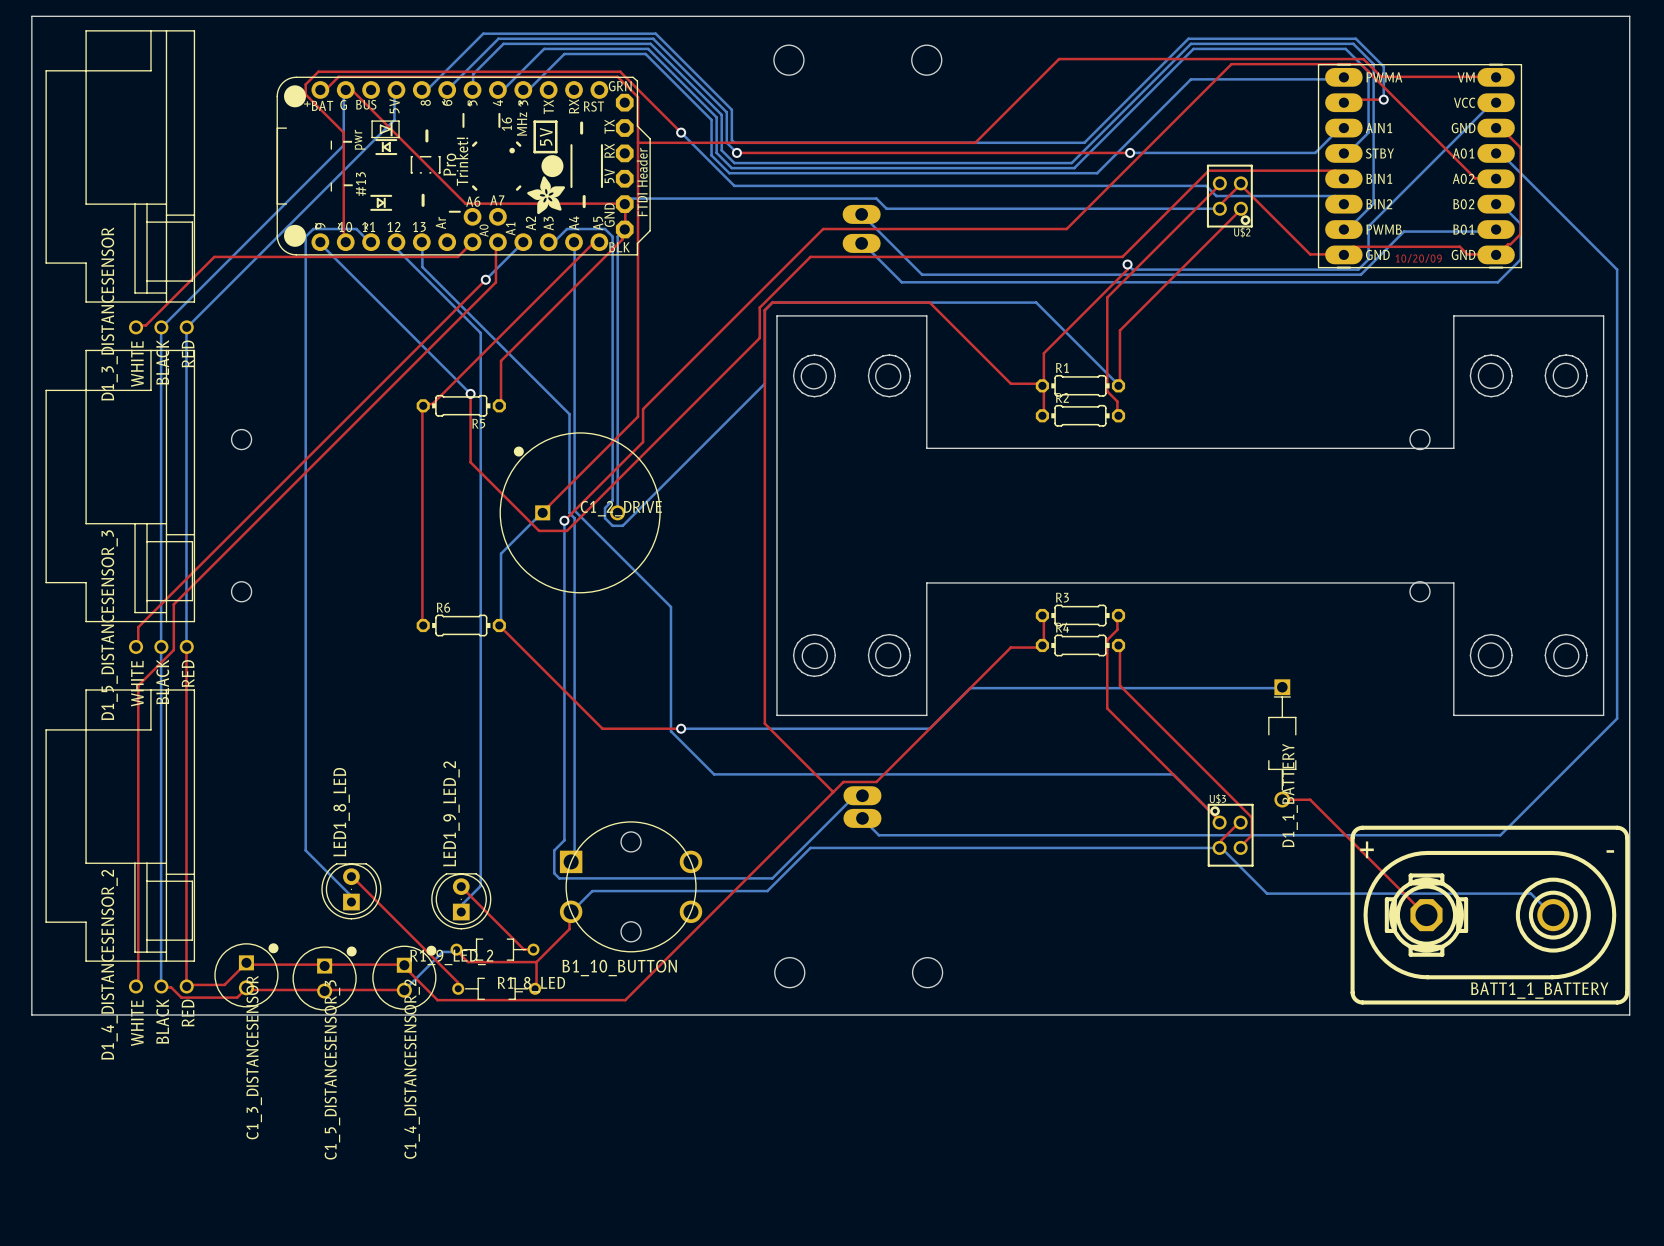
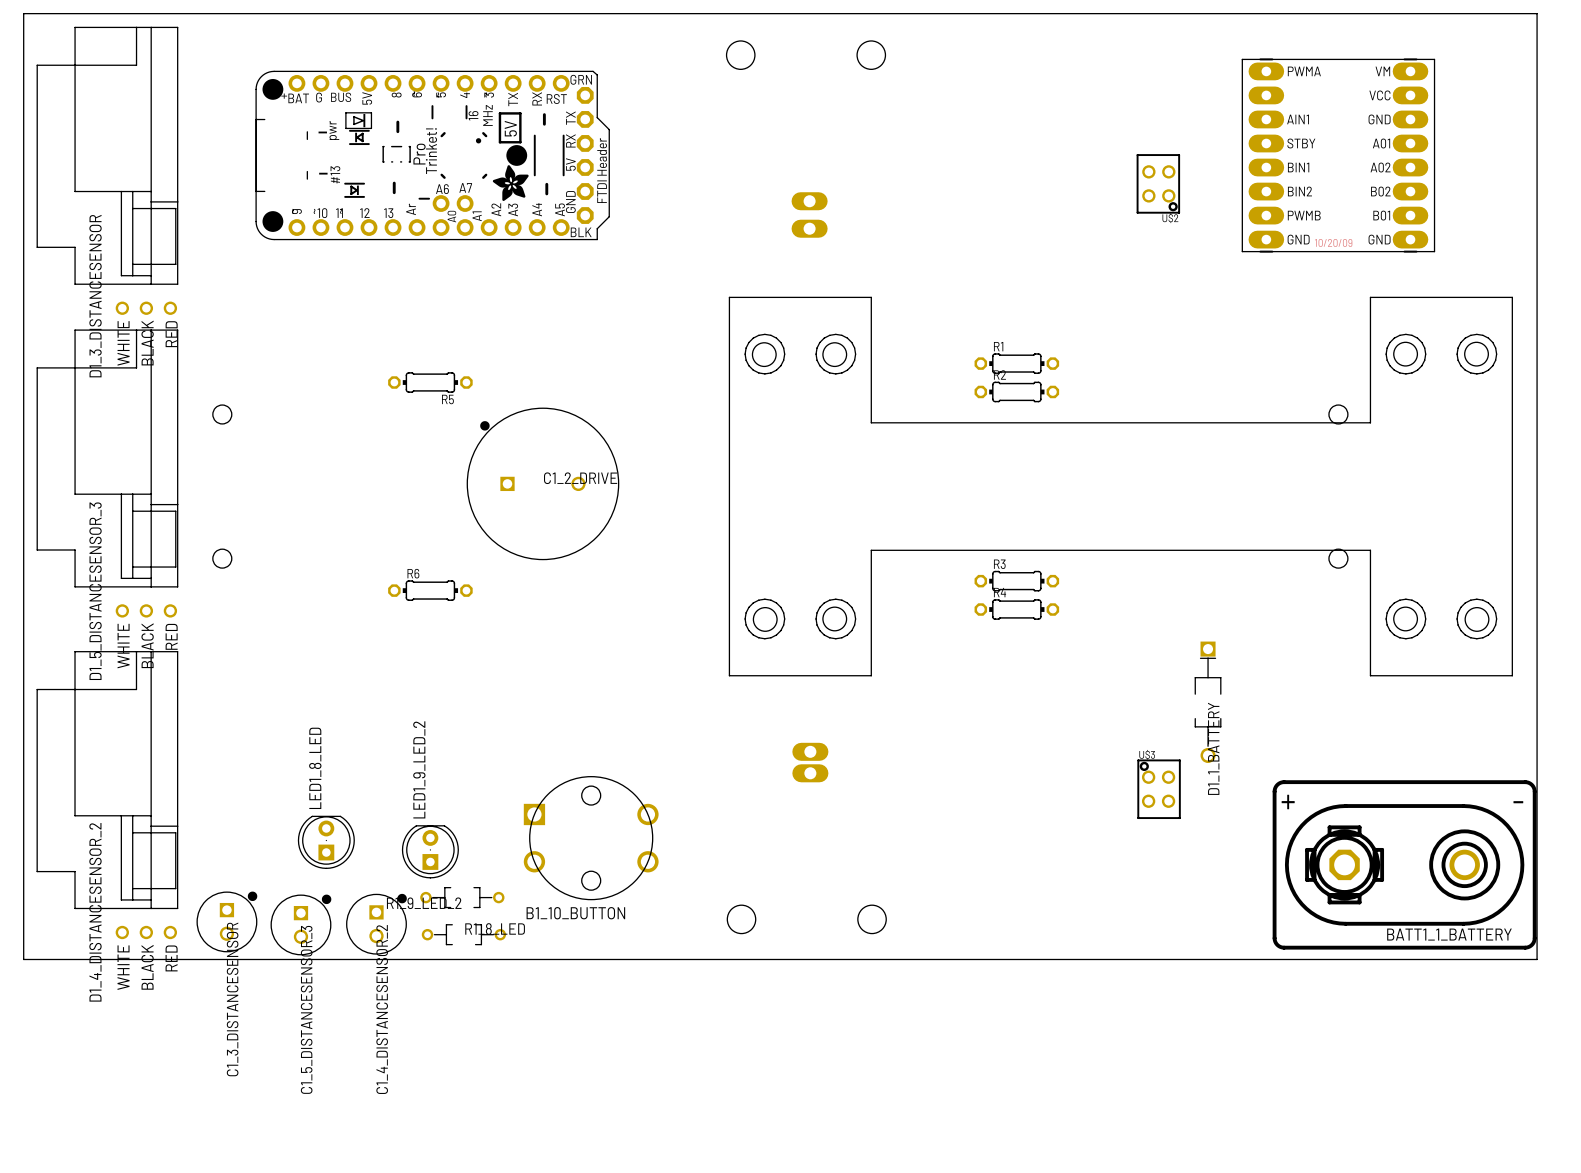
bottom track: (1343, 77) (1343, 79) (1190, 79) (1097, 173) (729, 173) (711, 155) (711, 119) (645, 53) (564, 53) (528, 89) (523, 89) -> none
top track: (1496, 77) (1381, 76) (1363, 59) (1059, 59) (975, 142) (638, 142) -> none
top track: (320, 89) (326, 89) (338, 76) (617, 76) (638, 97) (638, 416) (542, 512) -> none
bottom track: (345, 89) (343, 92) (343, 145) (161, 327) (161, 986) -> none
top track: (345, 89) (346, 92) (353, 92) (465, 203) (624, 204) (625, 229) (622, 231) (622, 239) (501, 360) (501, 404) (499, 405) -> none
bottom track: (396, 89) (394, 92) (394, 119) (186, 327) (186, 646) -> none
bottom track: (421, 89) (427, 89) (483, 33) (655, 33) (731, 109) (731, 140) (734, 142) (1084, 142) (1188, 38) (1355, 38) (1383, 66) (1383, 99) -> none
bottom track: (447, 89) (498, 38) (653, 38) (726, 112) (726, 142) (736, 152) -> none
bottom track: (472, 89) (473, 74) (503, 43) (650, 43) (721, 114) (721, 150) (734, 163) (1071, 163) (1190, 43) (1353, 43) (1373, 64) (1373, 203) (1345, 231) (1343, 229) -> none
bottom track: (497, 89) (503, 89) (544, 48) (648, 48) (716, 117) (716, 152) (731, 168) (1074, 168) (1193, 48) (1345, 48) (1368, 71) (1368, 132) (1345, 155) (1343, 153) -> none
top track: (1383, 99) (1348, 99) (1343, 102) -> none
via: (1383, 99) -> none
bottom track: (1496, 102) (1495, 104) (1490, 104) (1368, 226) (1368, 259) (1358, 269) (1132, 269) (1127, 264) -> none
bottom track: (1343, 128) (1343, 130) (1338, 130) (1315, 152) (1130, 152) -> none
top track: (1496, 128) (1502, 130) (1520, 147) (1520, 234) (1497, 254) (1467, 254) (1459, 246) (1353, 246) (1343, 254) (1310, 254) (1240, 183) (1221, 203) (1219, 208) -> none
bottom track: (681, 132) (734, 185) (1206, 185) (1216, 196) (1335, 196) (1343, 204) -> none
top track: (681, 132) (620, 71) (318, 71) (305, 84) (305, 94) (343, 132) (343, 241) (345, 242) -> none
via: (681, 132) -> none
top track: (736, 152) (1130, 152) -> none
via: (736, 152) -> none
via: (1130, 152) -> none
bottom track: (1496, 153) (1502, 155) (1617, 269) (1617, 718) (1500, 835) (878, 835) (862, 818) -> none
top track: (1343, 178) (1335, 170) (1208, 170) (1122, 256) (810, 256) (759, 307) (759, 338) (566, 530) (539, 530) (470, 462) (470, 393) -> none
top track: (1496, 178) (1475, 178) (1360, 64) (1231, 64) (1066, 229) (823, 229) (643, 409) (643, 442) (564, 520) -> none
top track: (1219, 183) (1107, 297) (1107, 391) (1117, 401) (1118, 415) -> none
bottom track: (624, 204) (630, 198) (876, 198) (886, 208) (1219, 208) -> none
bottom track: (1496, 204) (1502, 206) (1520, 223) (1520, 259) (1497, 282) (901, 282) (861, 243) -> none
top track: (1240, 208) (1119, 330) (1118, 385) -> none
bottom track: (861, 214) (922, 274) (1360, 274) (1404, 231) (1495, 231) (1496, 229) -> none
bottom track: (624, 229) (617, 236) (617, 512) -> none
bottom track: (320, 242) (470, 393) -> none
bottom track: (371, 242) (356, 229) (313, 229) (305, 236) (305, 850) (351, 896) (351, 902) -> none
bottom track: (396, 242) (397, 249) (480, 333) (480, 886) (462, 903) (462, 911) (461, 912) -> none
bottom track: (421, 242) (422, 267) (569, 414) (569, 513) (574, 518) (574, 858) (571, 861) -> none
top track: (472, 242) (457, 256) (214, 256) (145, 325) (136, 327) -> none
top track: (497, 242) (495, 244) (495, 282) (173, 604) (173, 650) (138, 685) (138, 984) (135, 986) -> none
bottom track: (523, 242) (485, 279) -> none
bottom track: (548, 242) (554, 241) (566, 229) (605, 229) (612, 236) (612, 500) (605, 508) (605, 518) (612, 525) (622, 525) (764, 383) (764, 310) (772, 302) (1036, 302) (1118, 385) -> none
bottom track: (574, 242) (574, 510) (670, 606) (670, 731) (714, 774) (1173, 774) (1219, 822) -> none
top track: (599, 242) (592, 244) (432, 404) (424, 404) (422, 406) (423, 625) -> none
top track: (1127, 264) (1127, 269) (1043, 353) (1042, 385) -> none
via: (1127, 264) -> none
top track: (485, 279) (138, 627) (138, 645) (136, 646) -> none
via: (485, 279) -> none
top track: (1042, 385) (1042, 415) -> none
top track: (1042, 385) (1041, 383) (1010, 383) (929, 302) (772, 302) (764, 310) (764, 723) (833, 792) -> none
via: (470, 393) -> none
bottom track: (542, 512) (501, 553) (501, 624) (499, 625) -> none
bottom track: (564, 520) (564, 840) (554, 850) (554, 873) (559, 878) (772, 878) (853, 797) (862, 795) -> none
via: (564, 520) -> none
top track: (1042, 615) (1043, 645) (1041, 647) (1010, 647) (876, 782) (843, 782) (625, 1000) (437, 1000) (402, 964) (324, 966) (247, 964) (246, 962) (224, 984) (186, 986) (186, 646) -> none
top track: (1118, 615) (1117, 629) (1107, 639) (1107, 708) (1219, 822) -> none
top track: (499, 625) (602, 728) (681, 728) -> none
top track: (1118, 645) (1119, 685) (1251, 817) (1251, 835) (1240, 847) -> none
bottom track: (1282, 687) (970, 688) (929, 728) (681, 728) -> none
via: (681, 728) -> none
top track: (1282, 799) (1310, 799) (1426, 915) -> none
top track: (1240, 822) (1221, 840) (1219, 847) -> none
top track: (351, 876) (457, 982) (458, 988) -> none
top track: (461, 886) (523, 949) (533, 949) -> none
bottom track: (571, 911) (592, 891) (767, 891) (810, 847) (1219, 847) (1267, 893) (1530, 893) (1553, 915) -> none
top track: (571, 911) (569, 929) (536, 962) -> none
bottom track: (456, 949) (455, 951) (442, 951) (404, 990) -> none
top track: (456, 949) (468, 962) (536, 962) -> none
top track: (536, 962) (535, 988) -> none
top track: (161, 986) (171, 987) (181, 997) (237, 997) (246, 987) (247, 990) (404, 990) -> none

